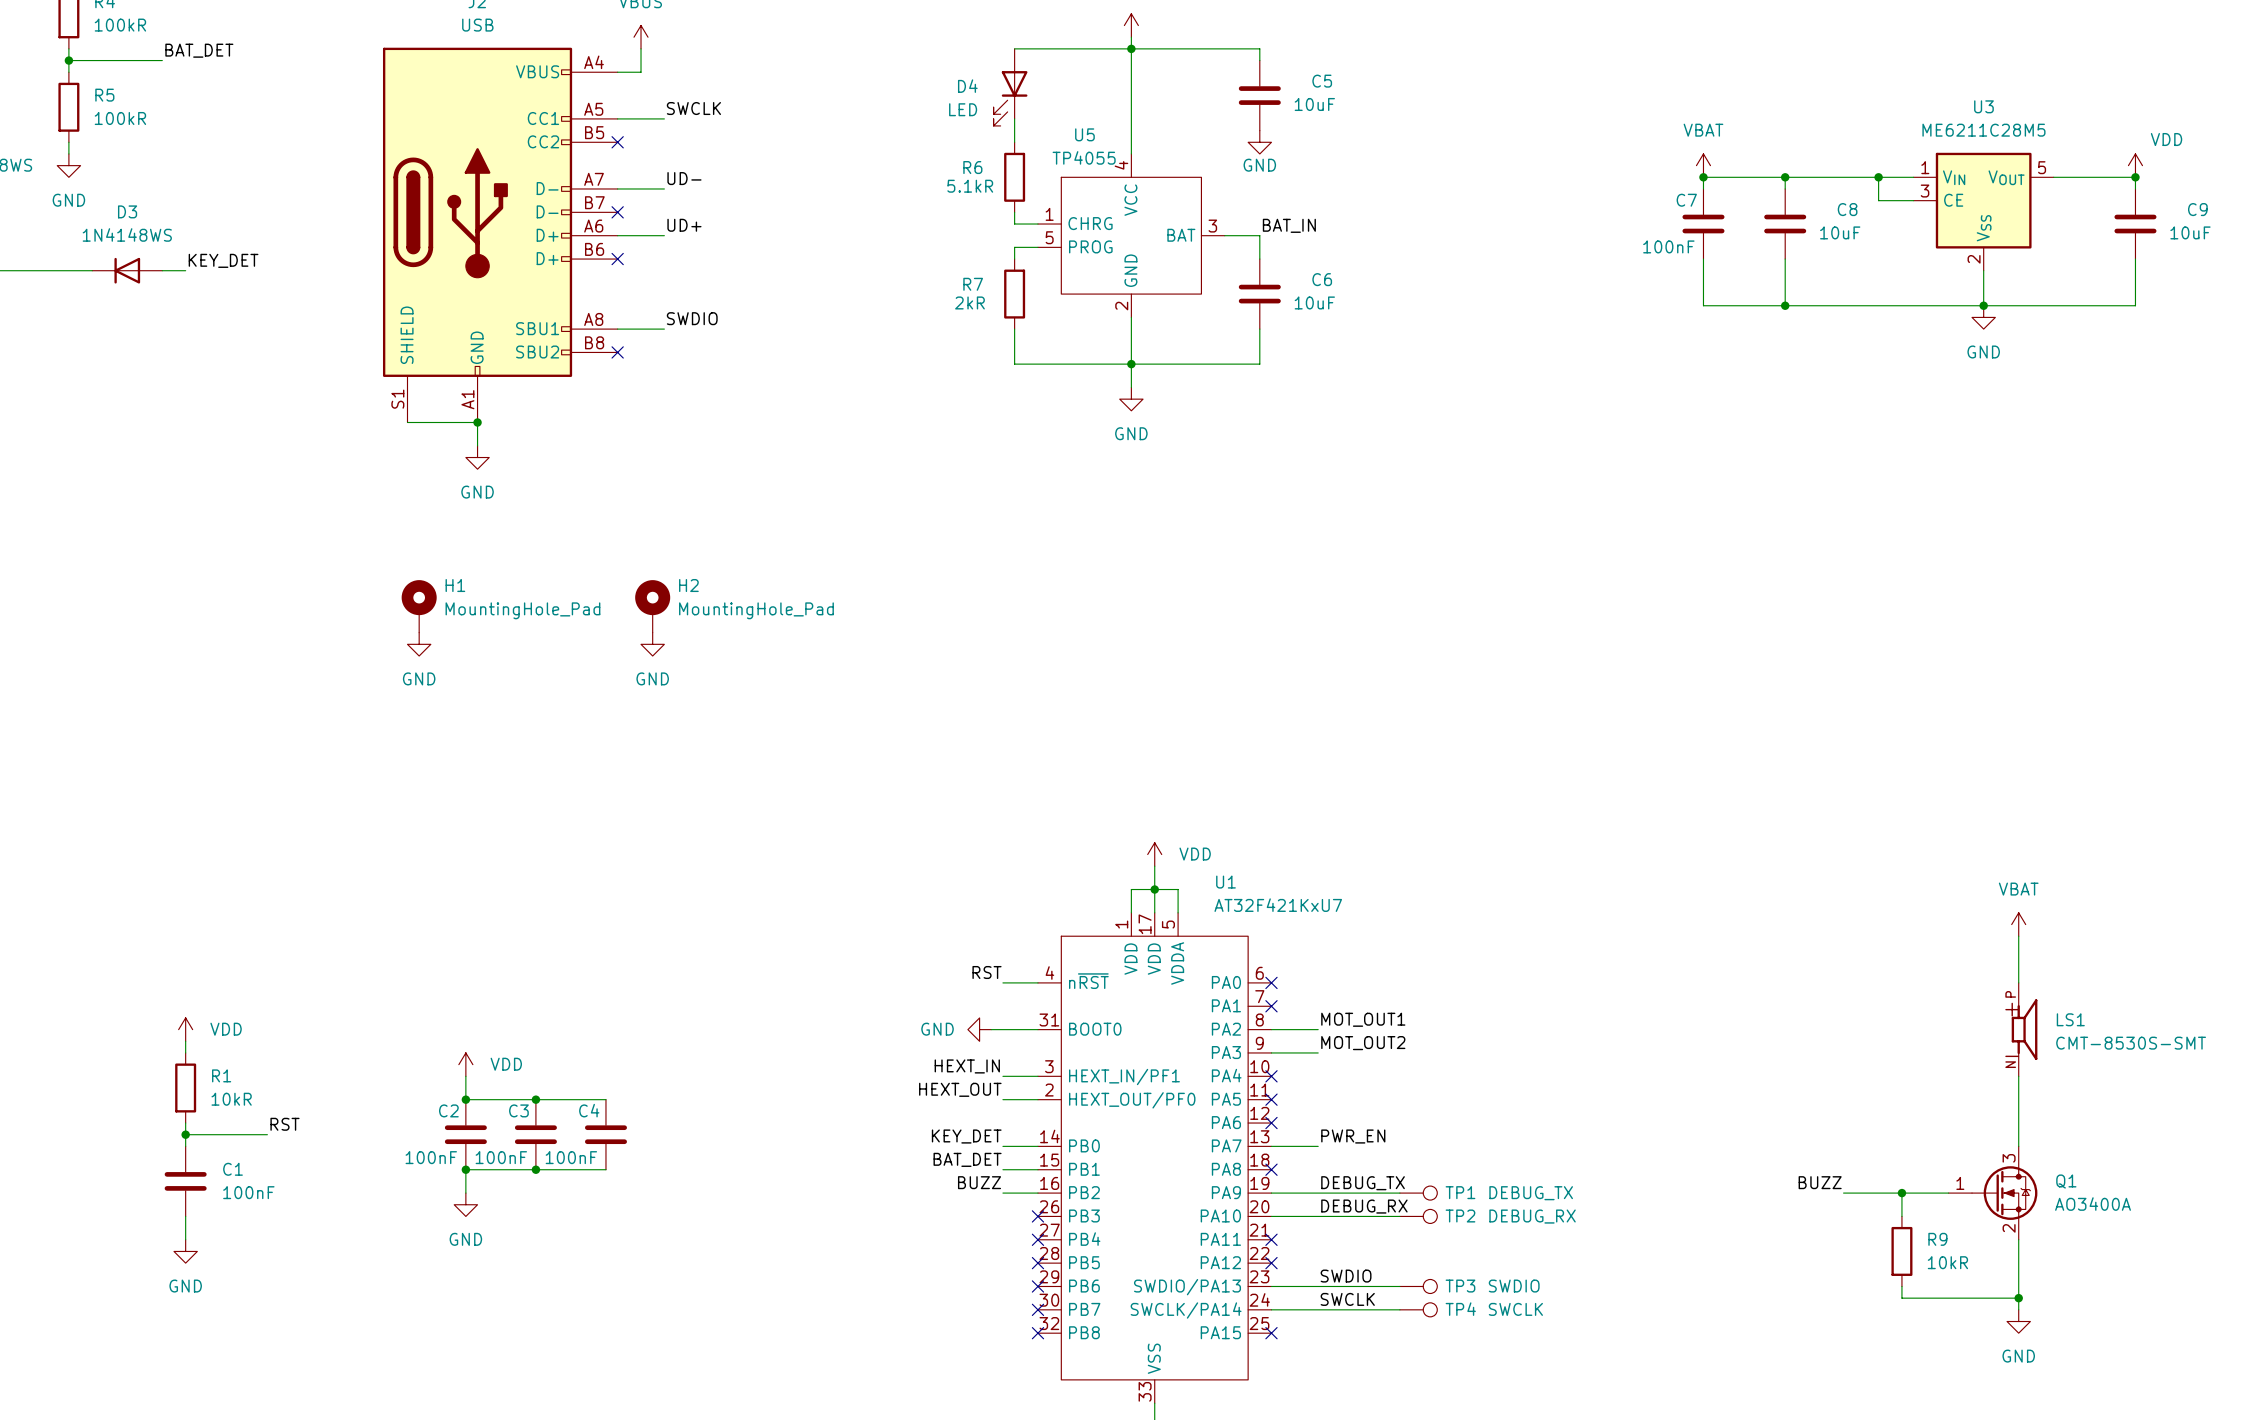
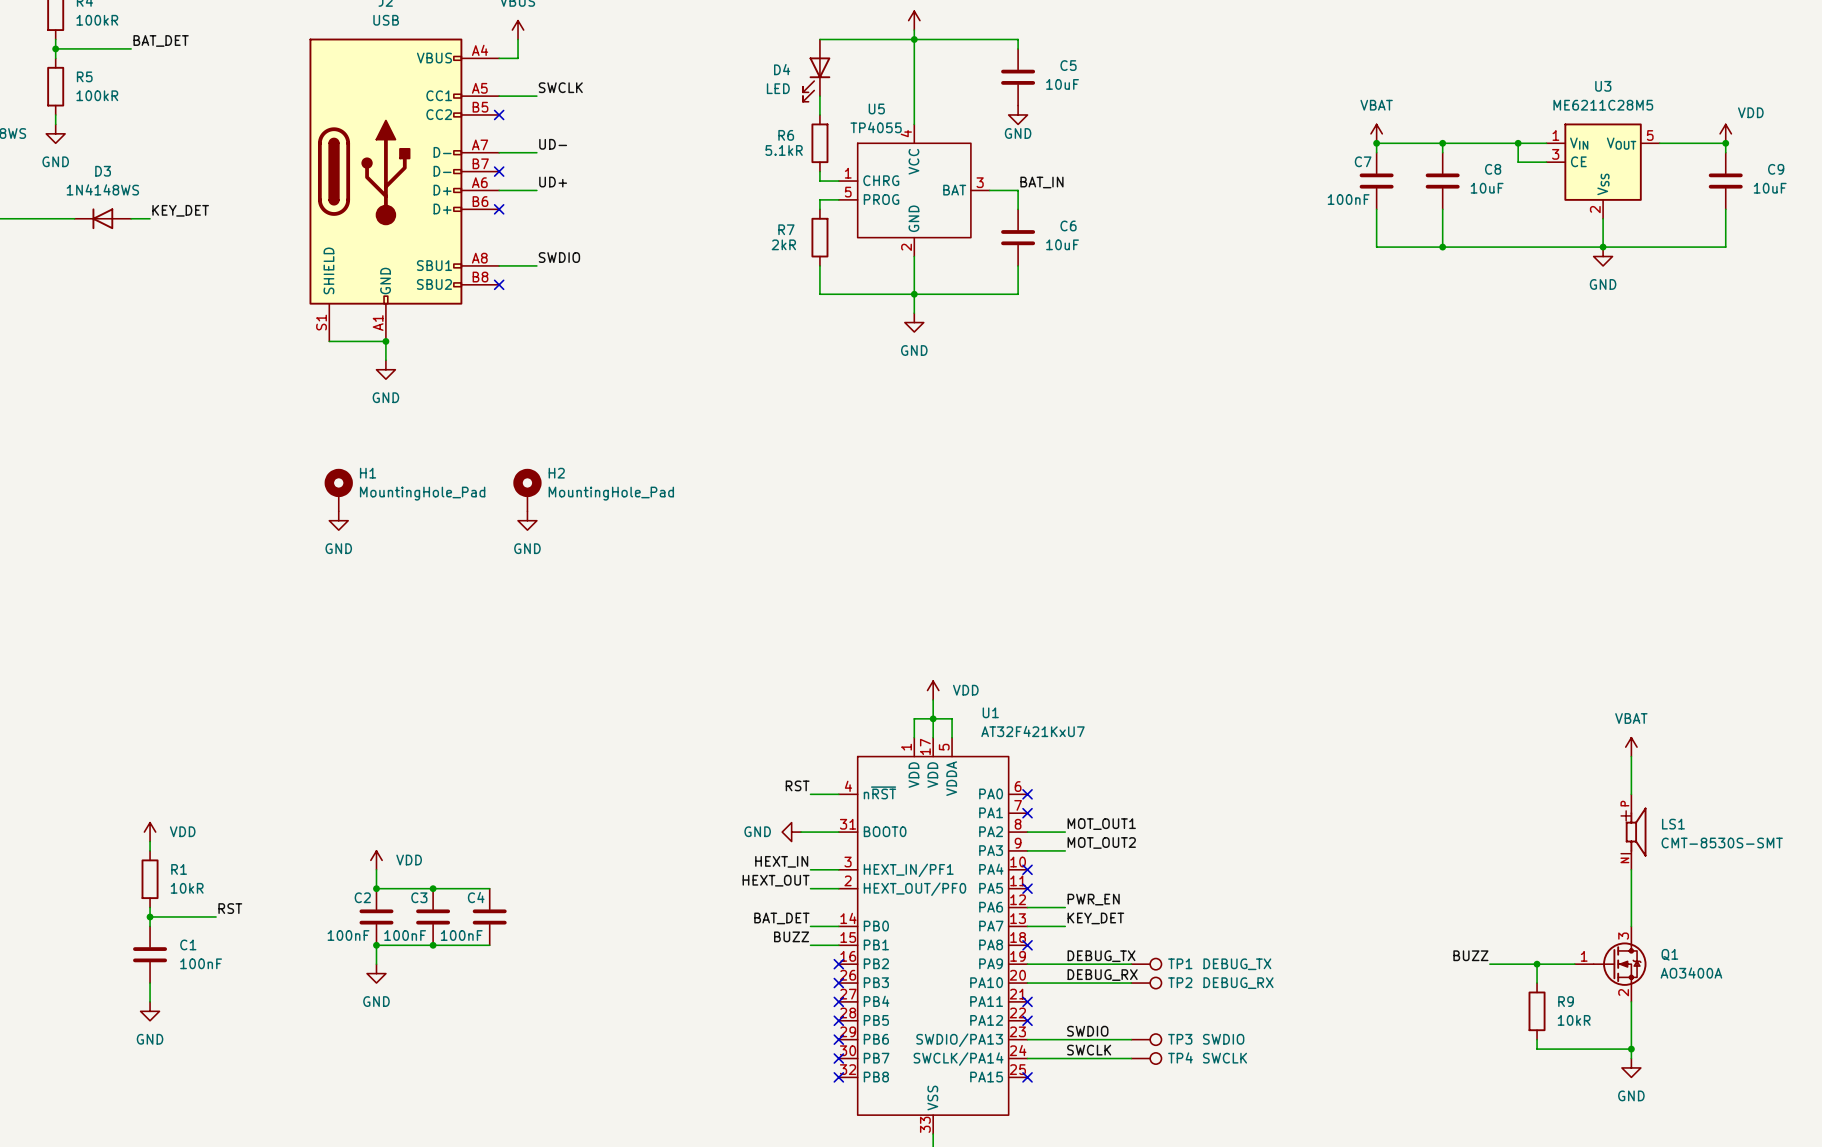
label: none -> PWR_EN (1093, 899)
wire: none -> (1027, 907) (1065, 907)
no-connect mark: (1271, 1123) -> none
label: KEY_DET (966, 1136) -> BAT_DET (781, 918)
label: PWR_EN (1353, 1136) -> KEY_DET (1095, 918)
label: BAT_DET (967, 1159) -> BUZZ (791, 936)
label: BUZZ (979, 1182) -> none
wire: (1002, 1193) (1037, 1193) -> none
no-connect mark: none -> (838, 964)

